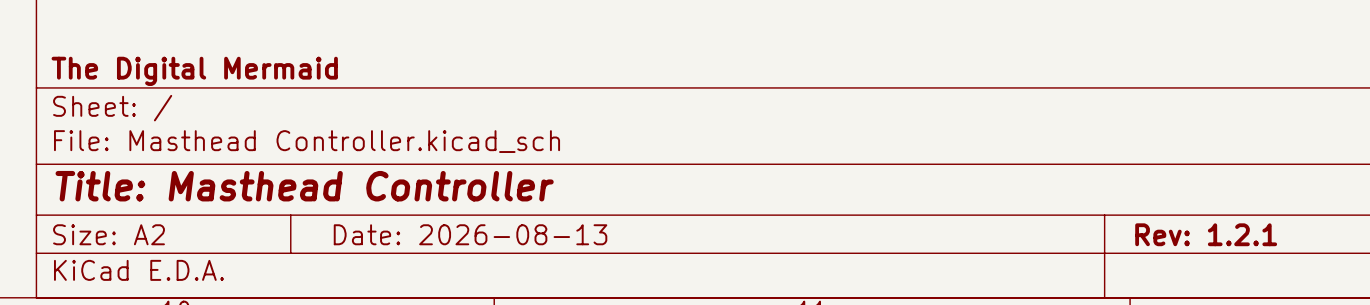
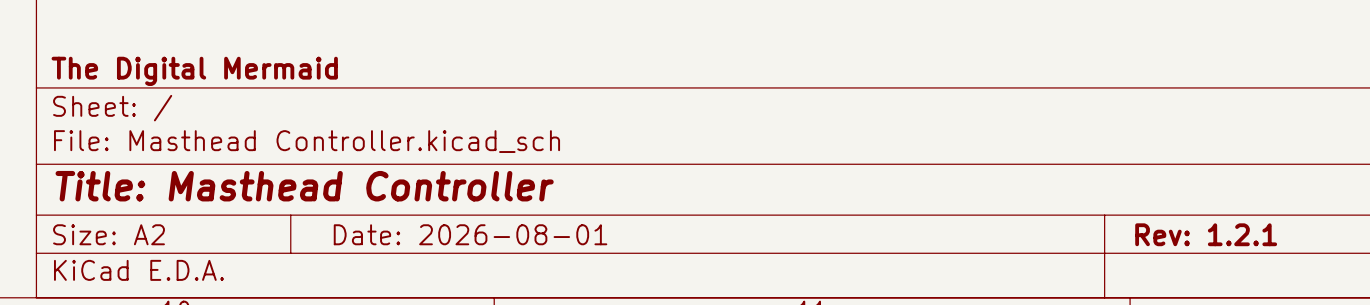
title block: Date: 2026-08-13 (470, 234) -> Date: 2026-08-01 (470, 234)

